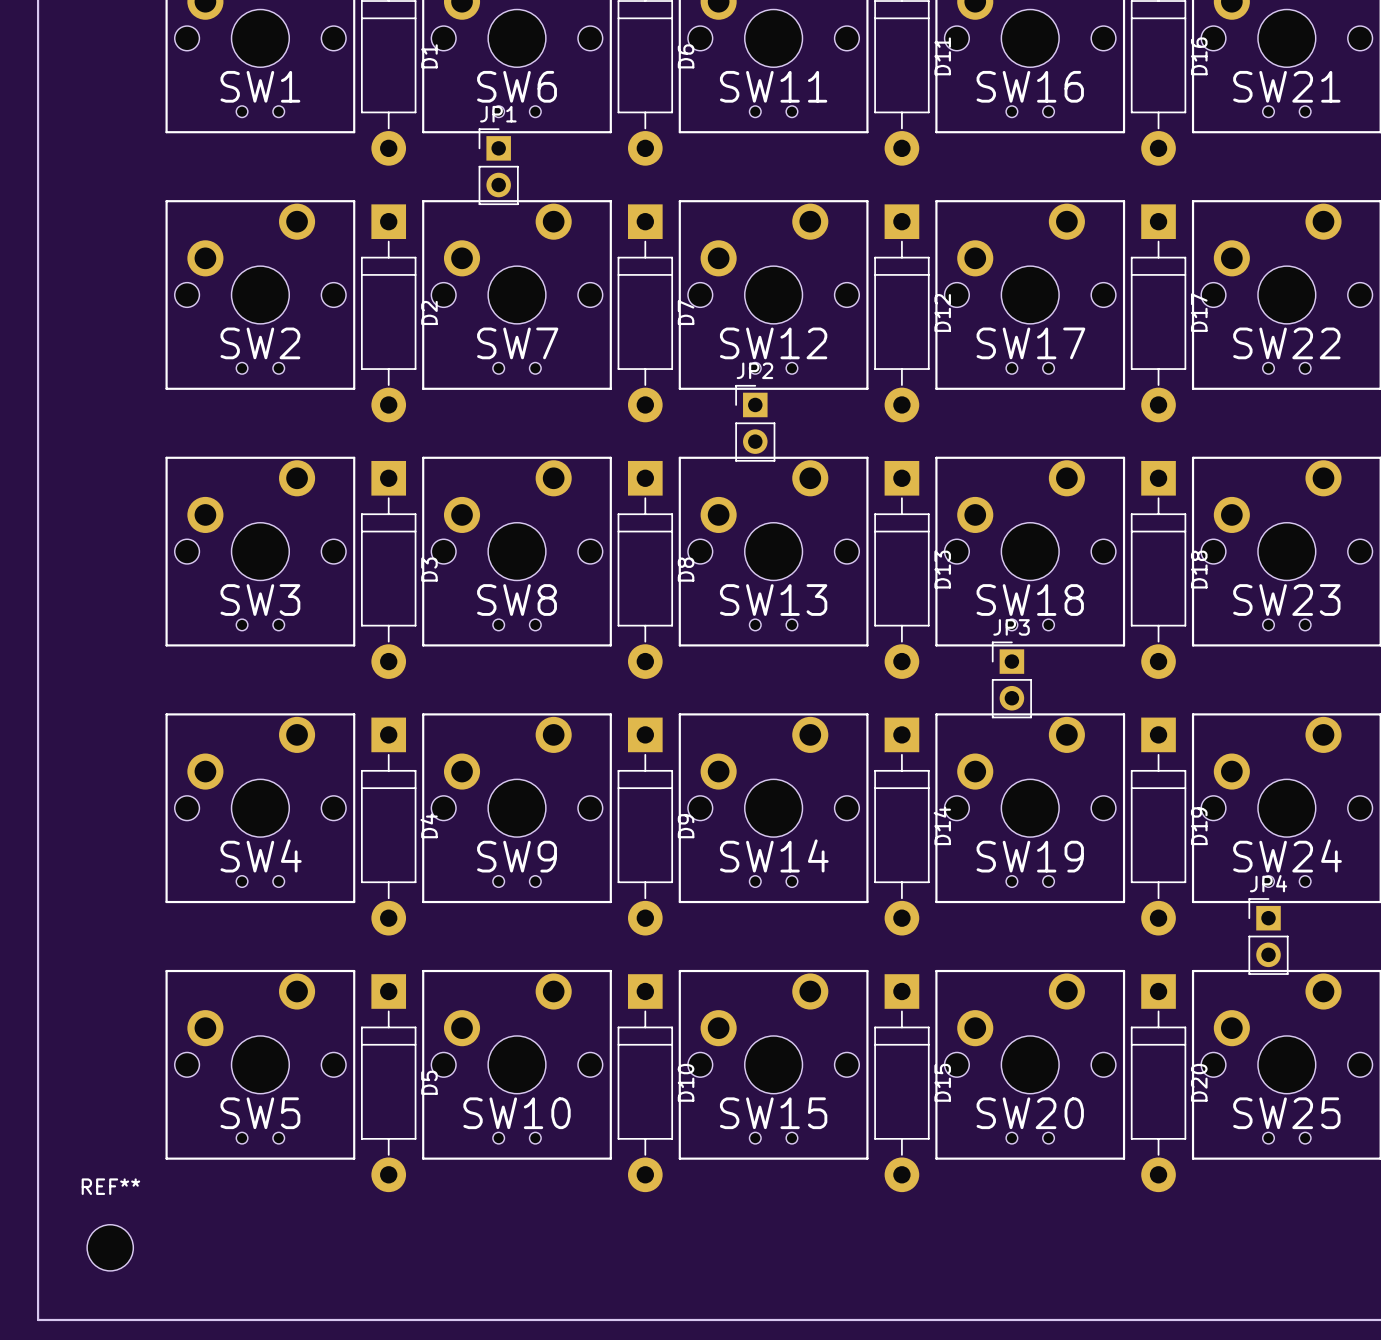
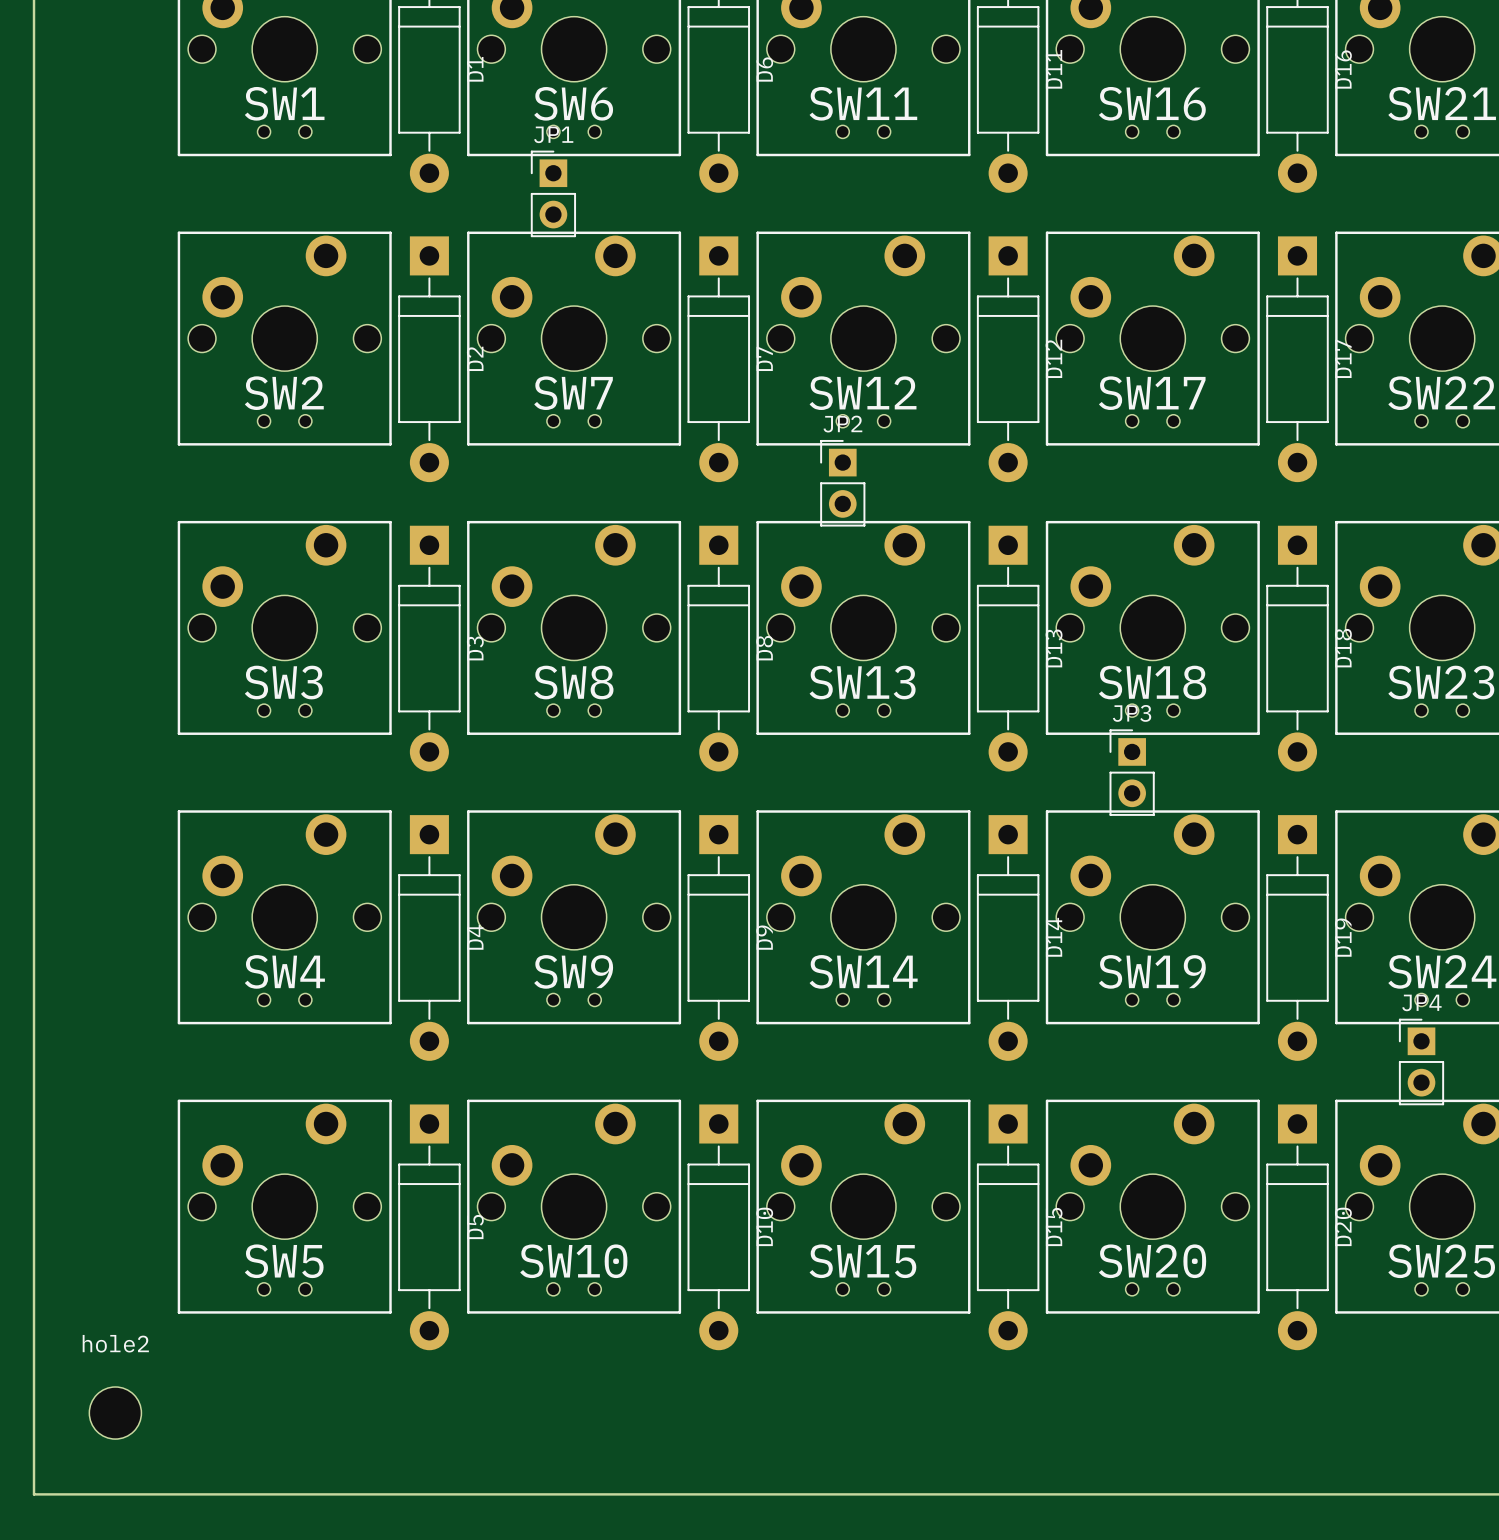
REF** name: REF** (110, 1186) -> hole2 (115, 1343)

